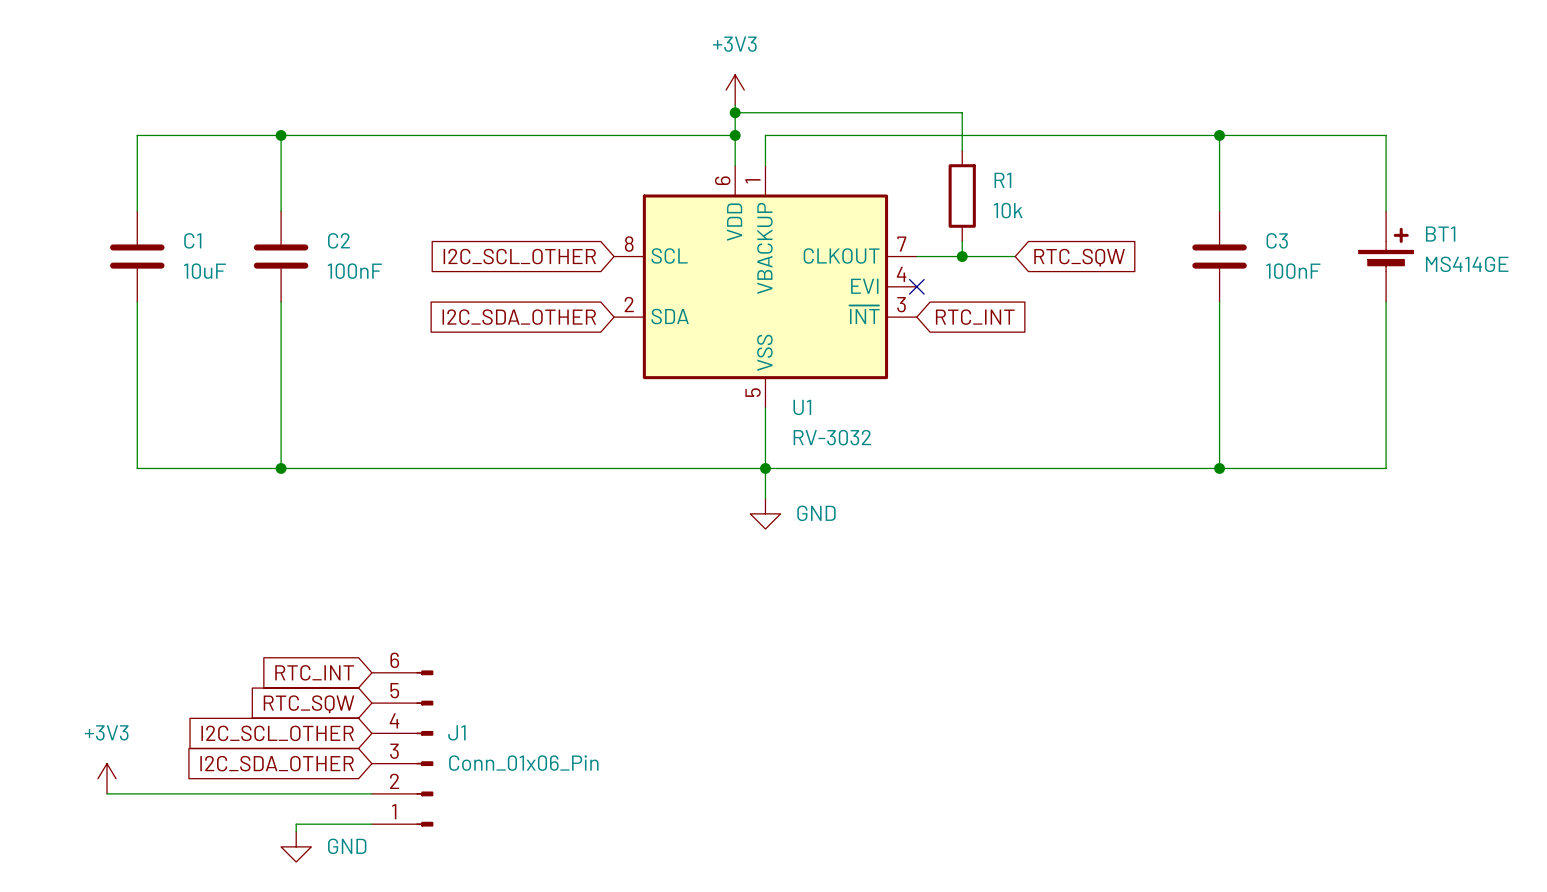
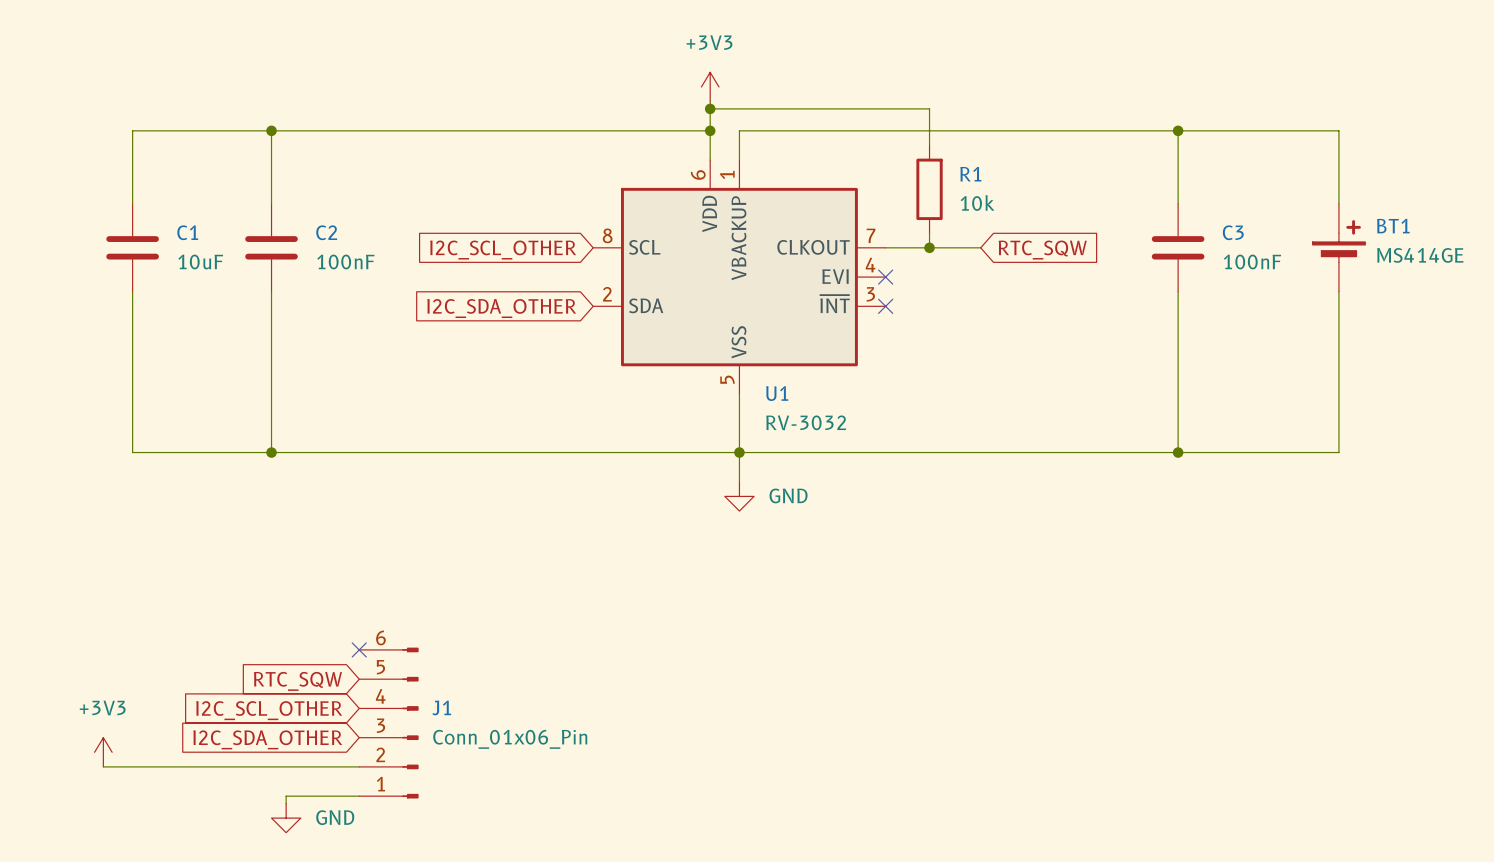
no-connect mark: none -> (885, 306)
global label: RTC_INT (975, 317) -> none
global label: RTC_INT (314, 672) -> none
no-connect mark: none -> (359, 649)

